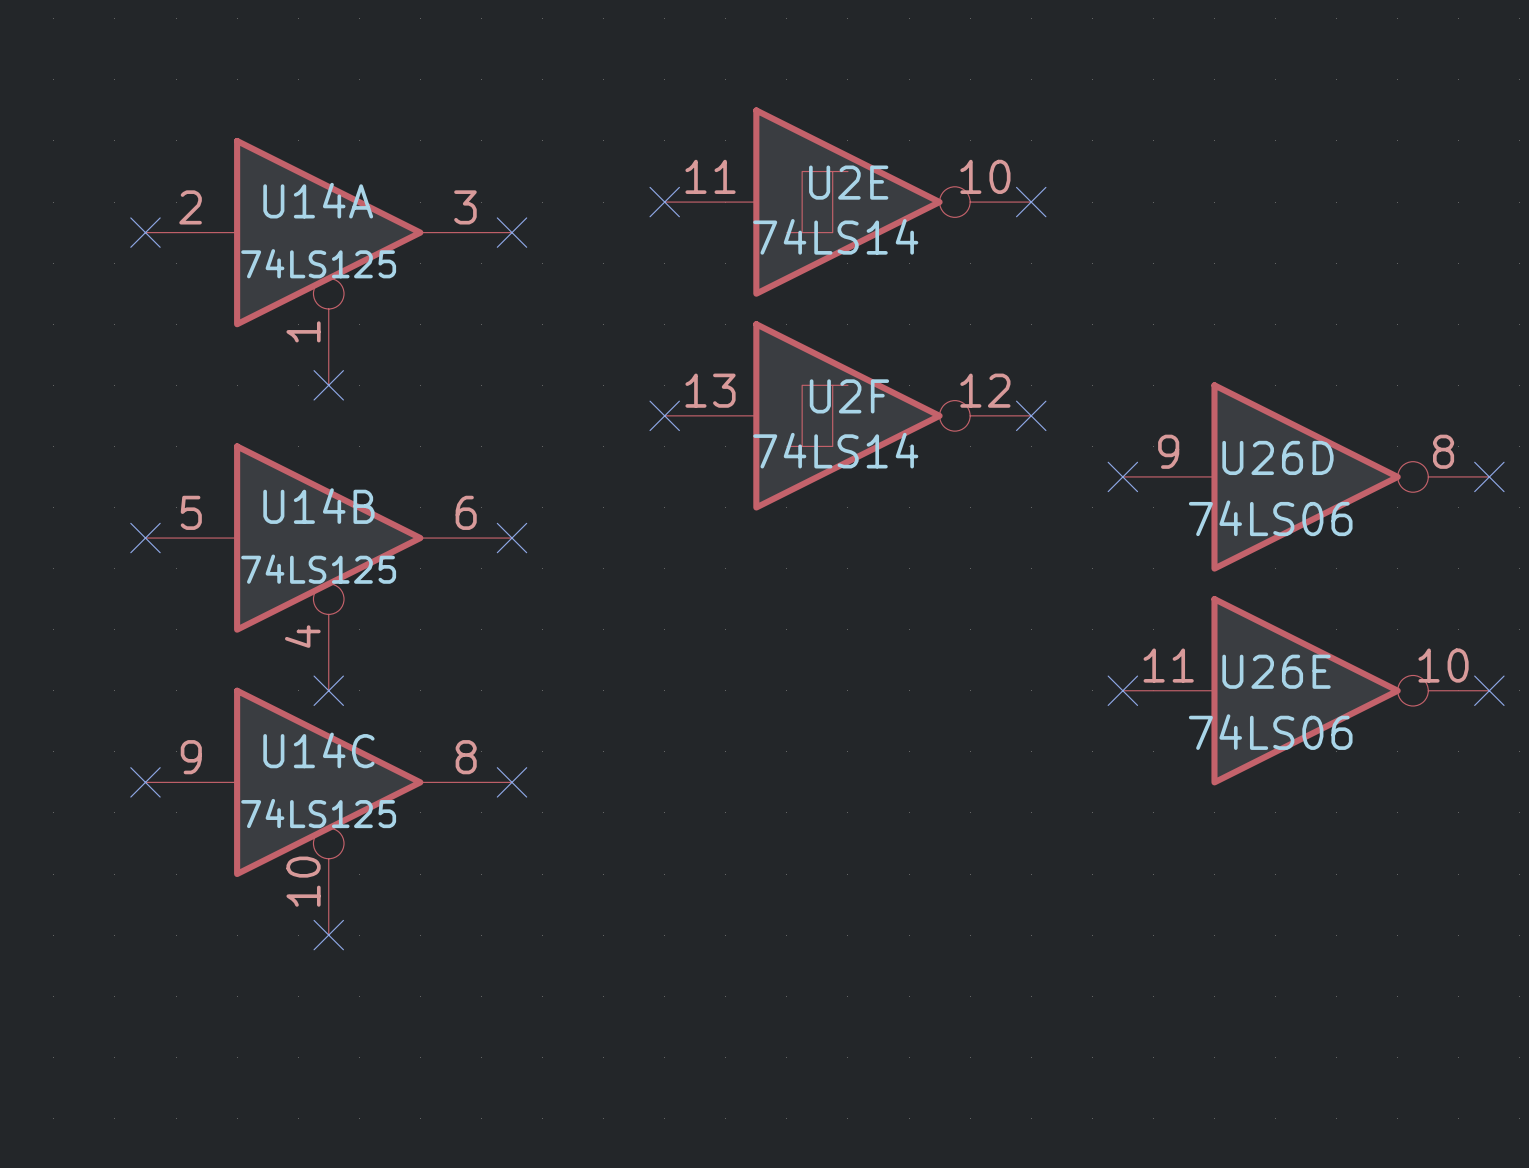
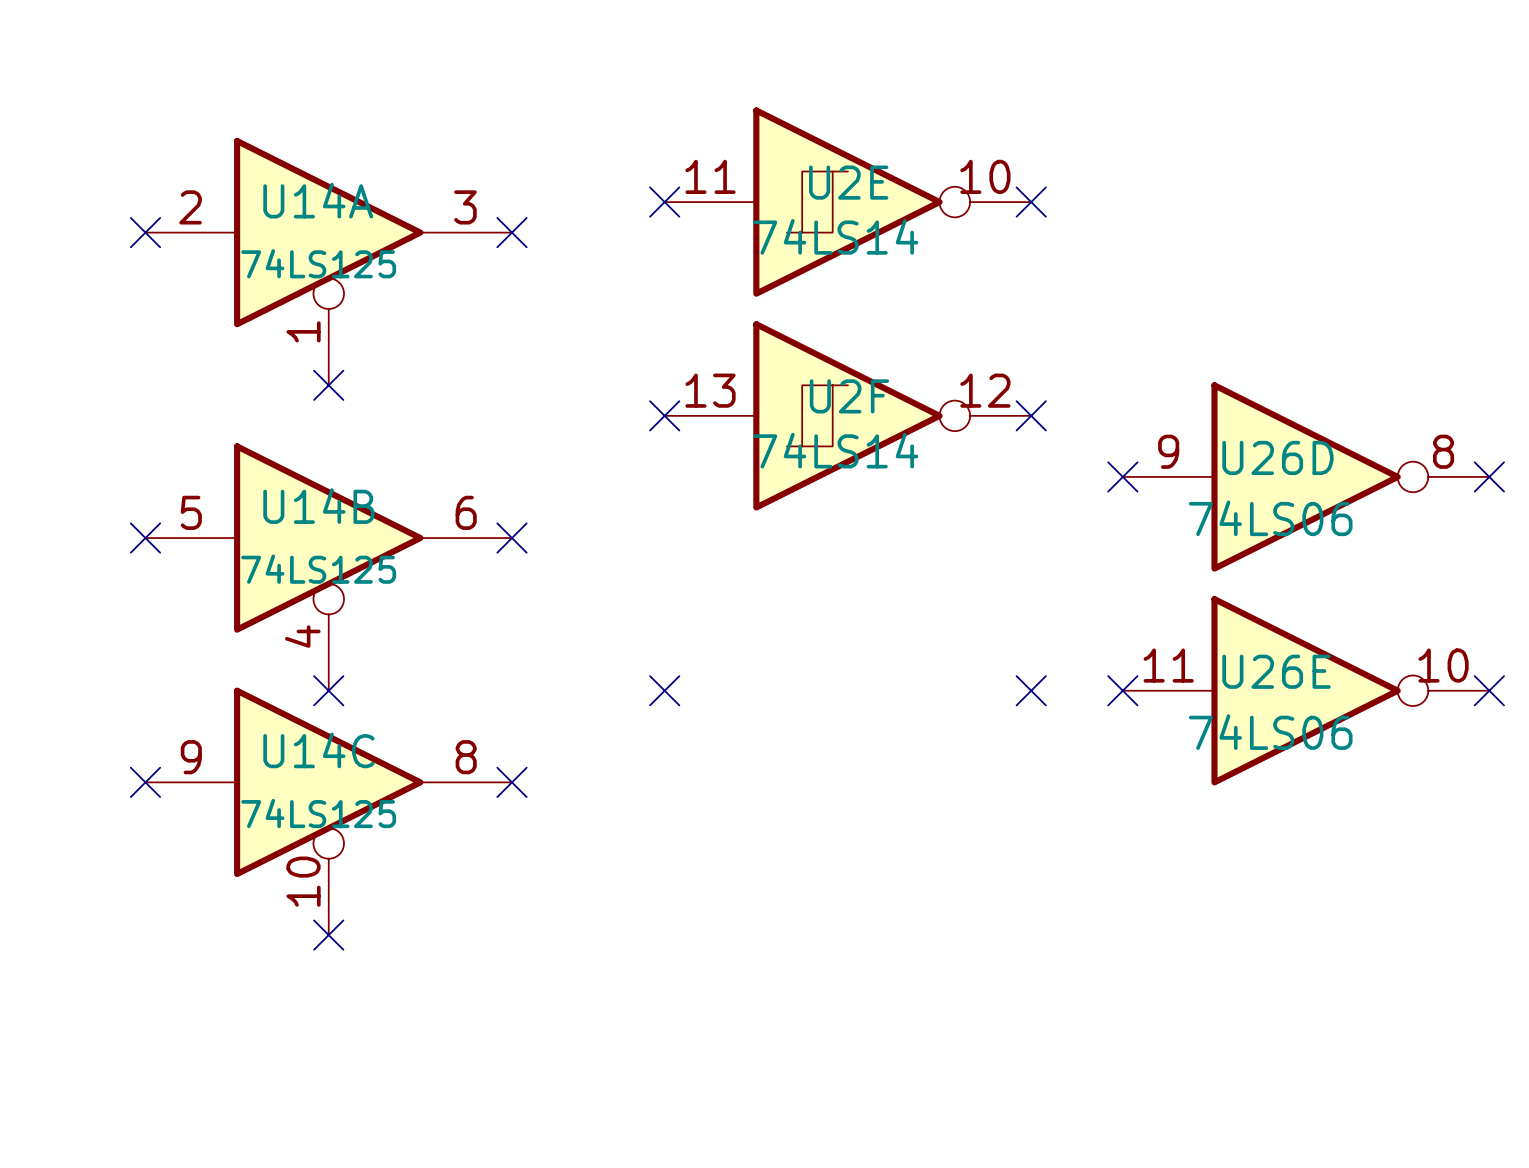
no-connect mark: none -> (664, 690)
no-connect mark: none -> (1031, 690)

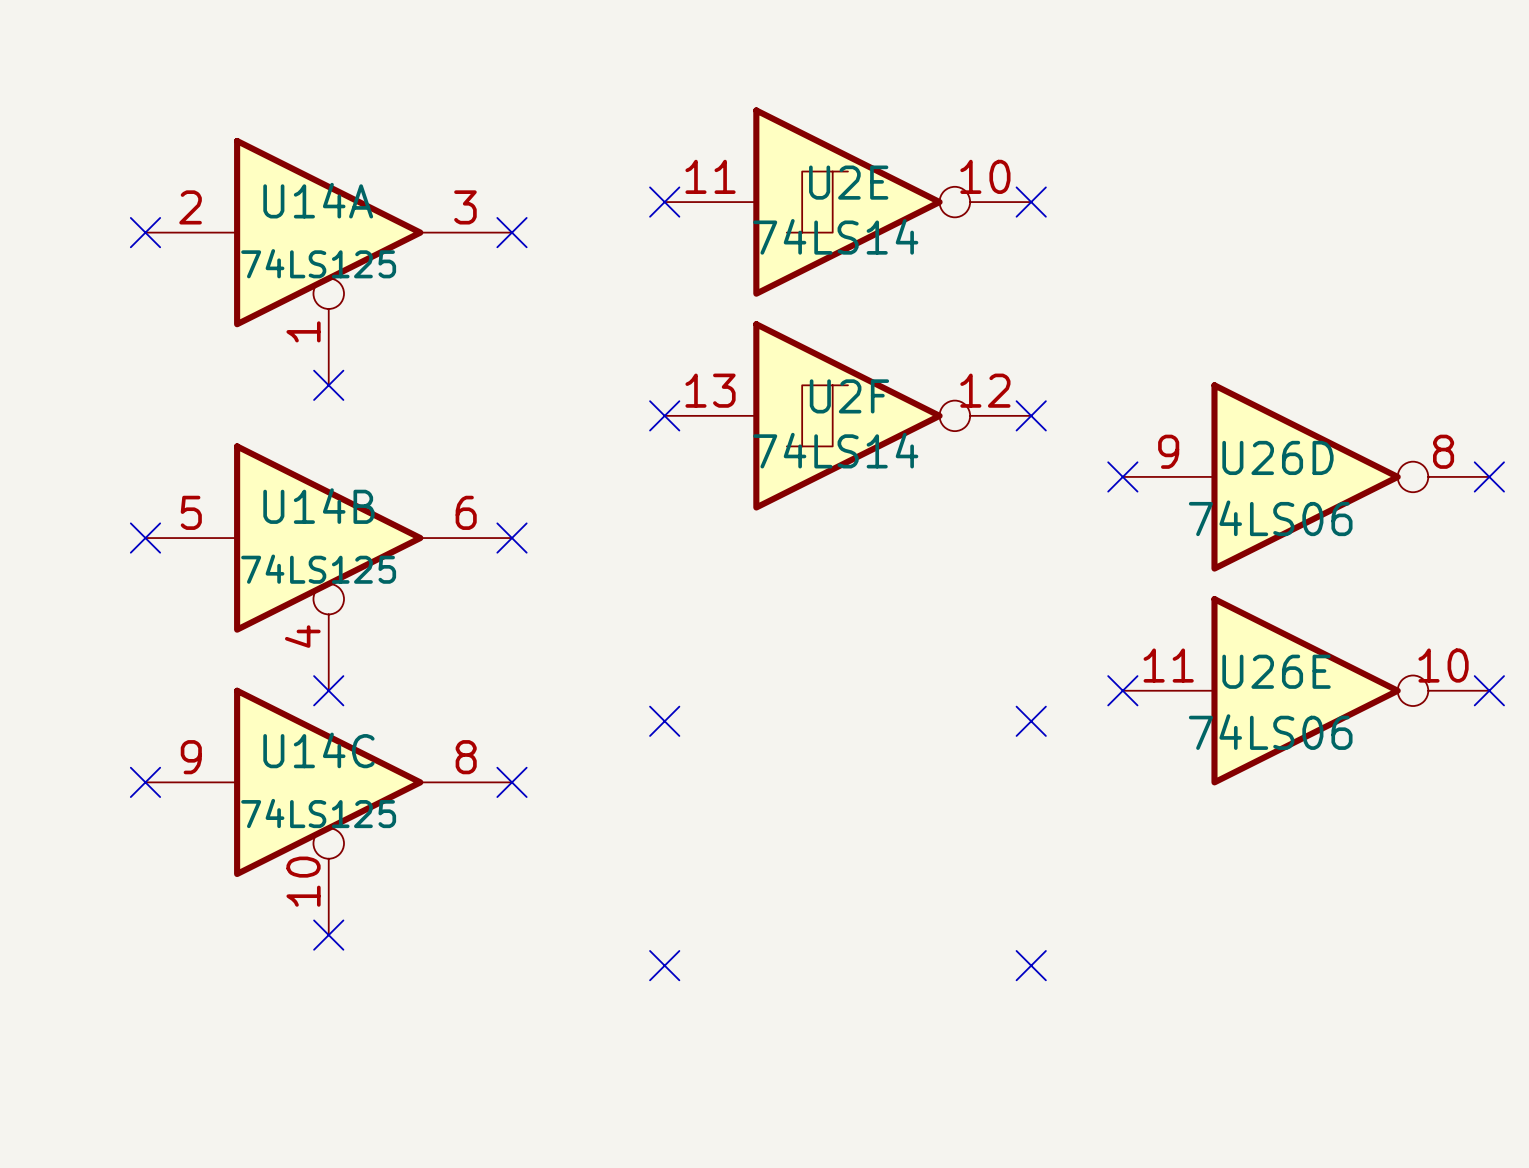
no-connect mark position: (664, 690) -> (664, 721)
no-connect mark position: (1031, 690) -> (1031, 721)
no-connect mark: none -> (664, 965)
no-connect mark: none -> (1031, 965)

